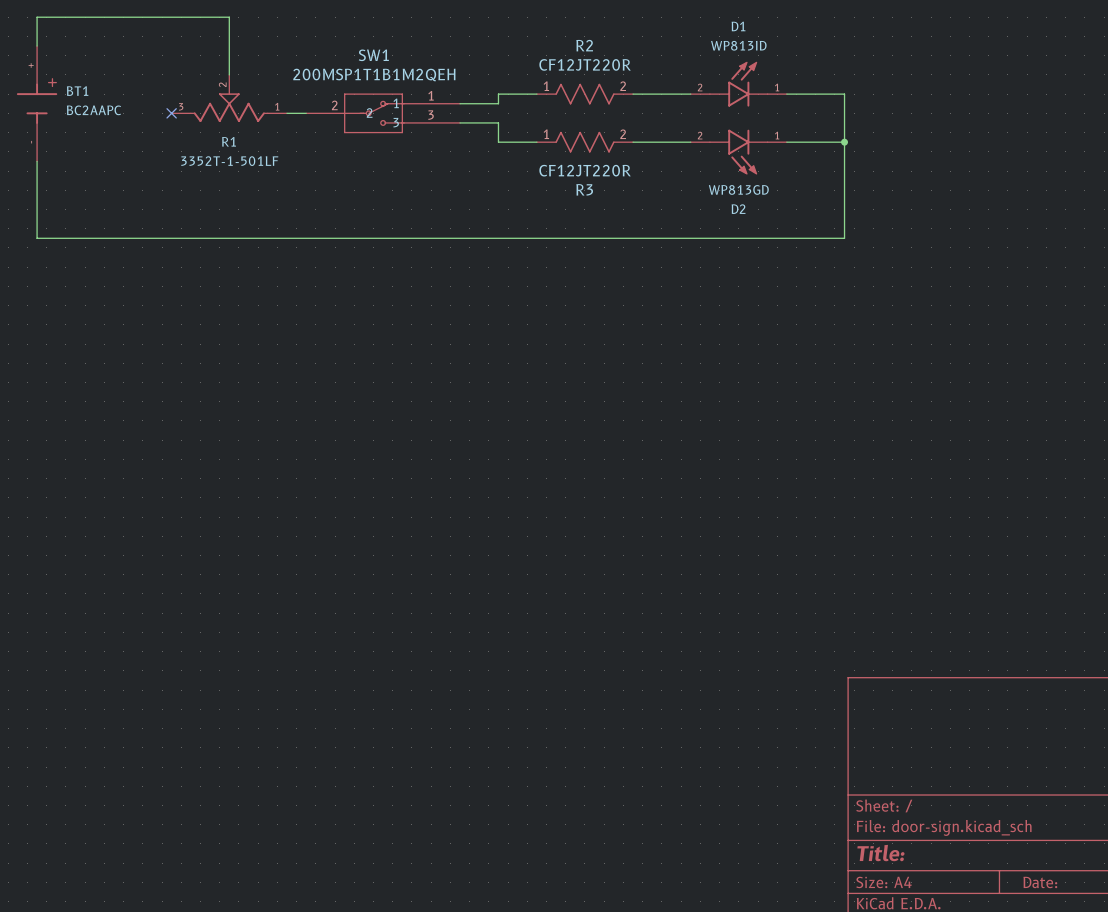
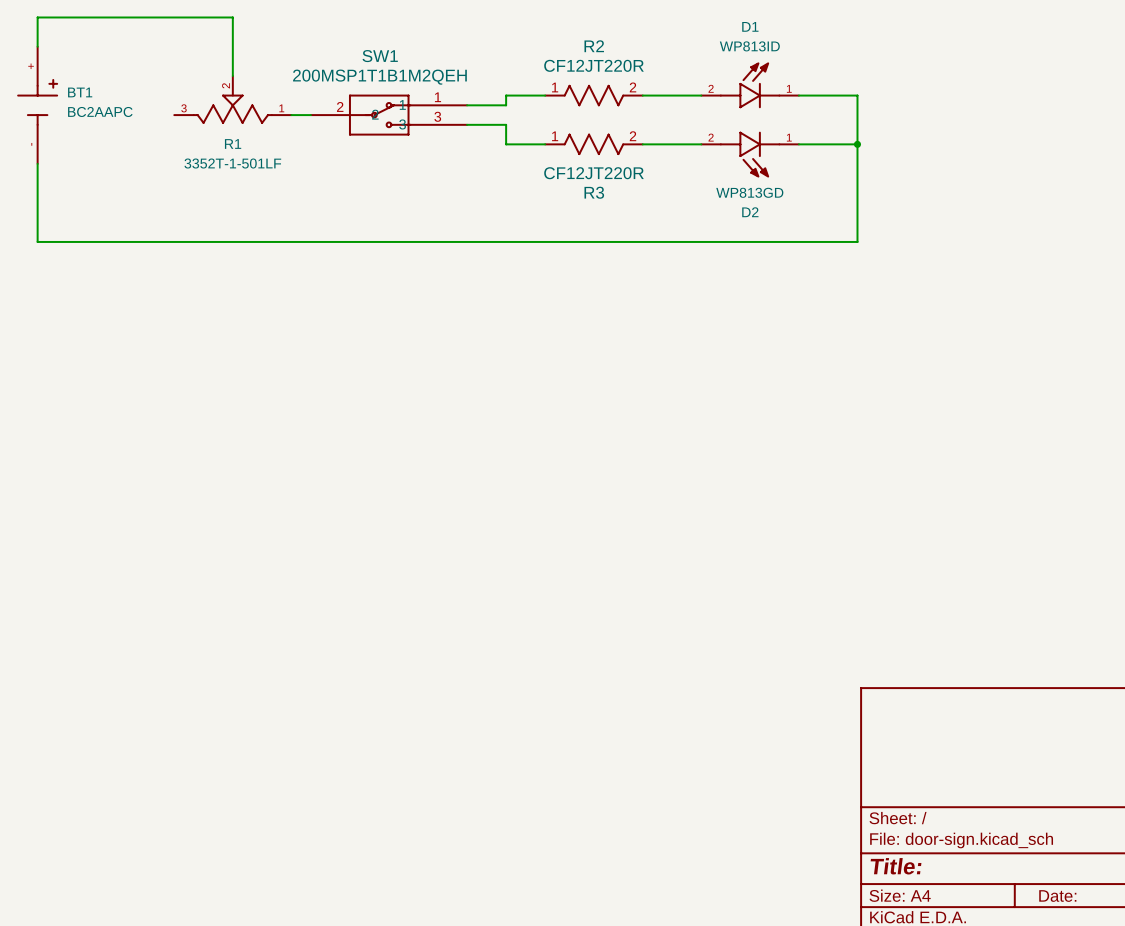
no-connect mark: (171, 113) -> none

